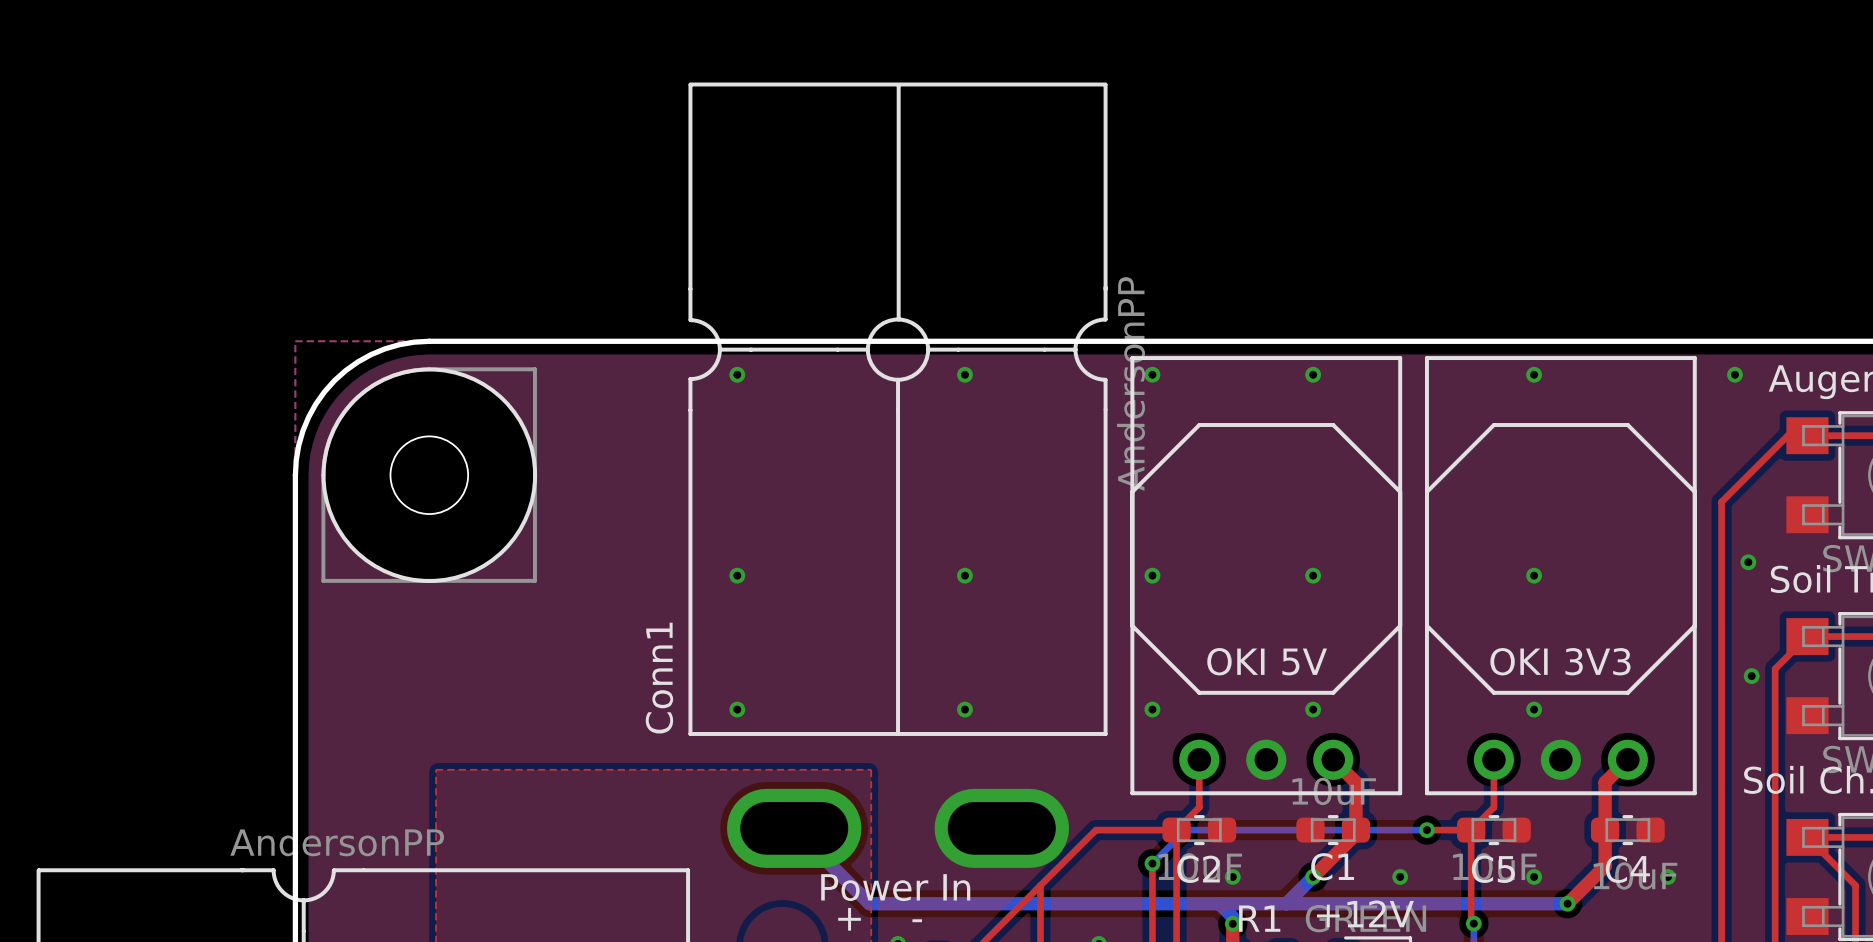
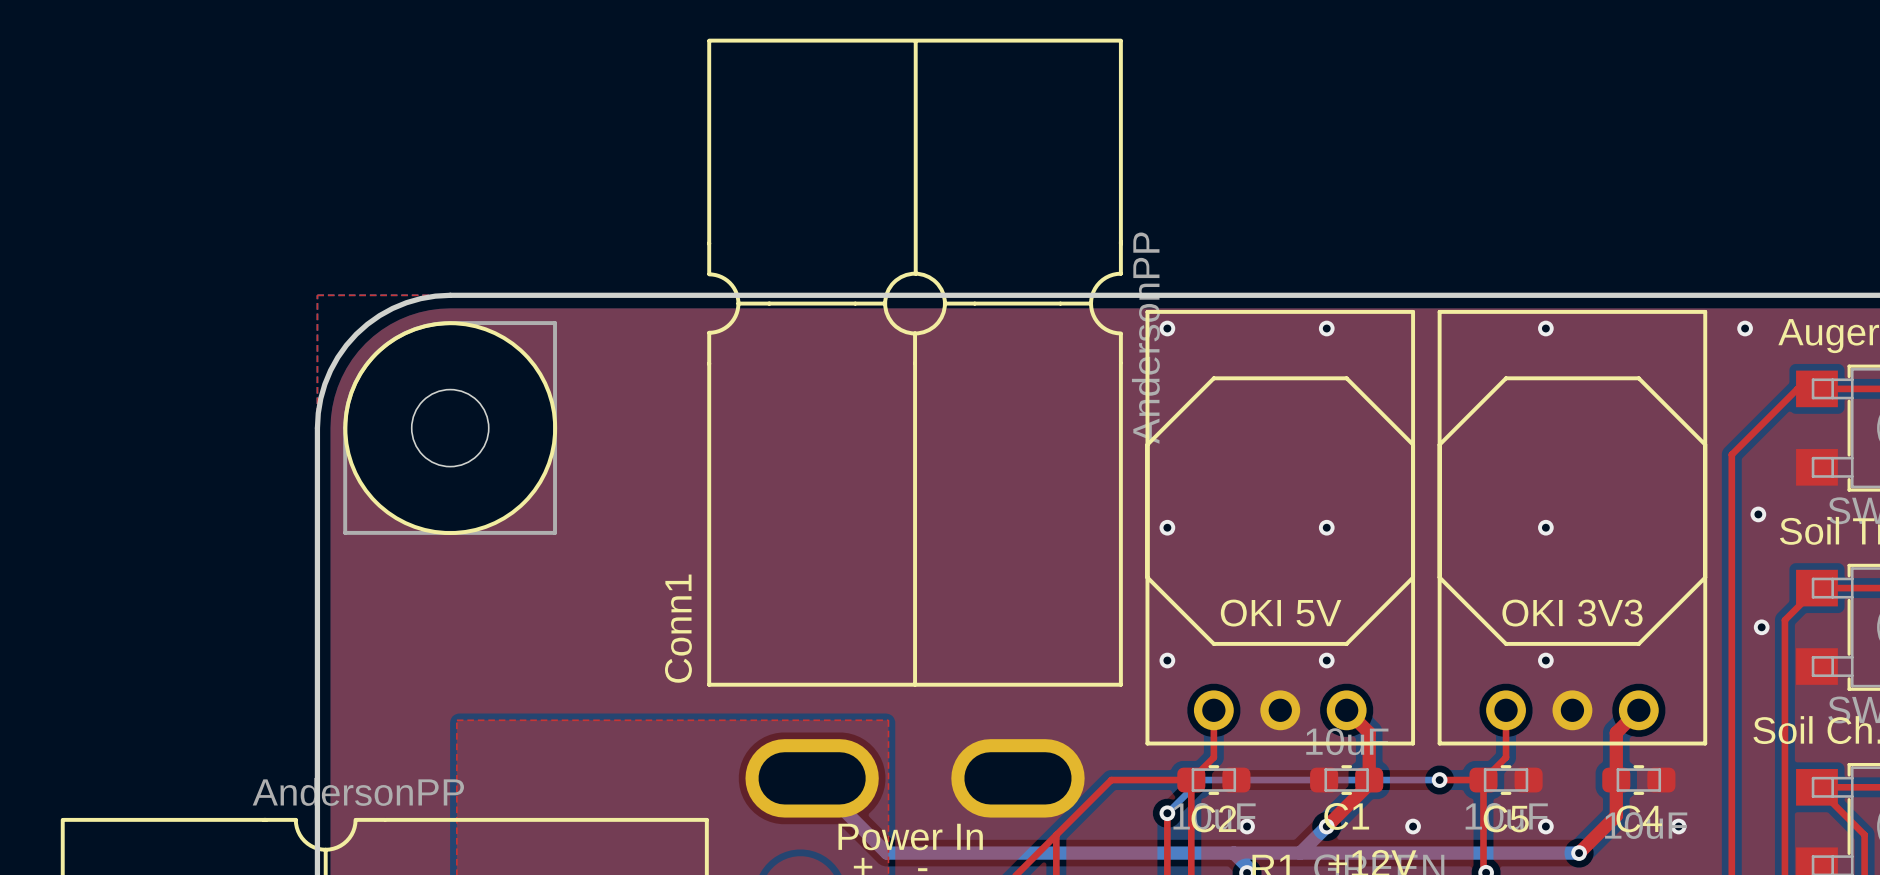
via: (737, 374) -> none
via: (964, 374) -> none
via: (737, 575) -> none
via: (964, 575) -> none
via: (737, 709) -> none
via: (964, 709) -> none

